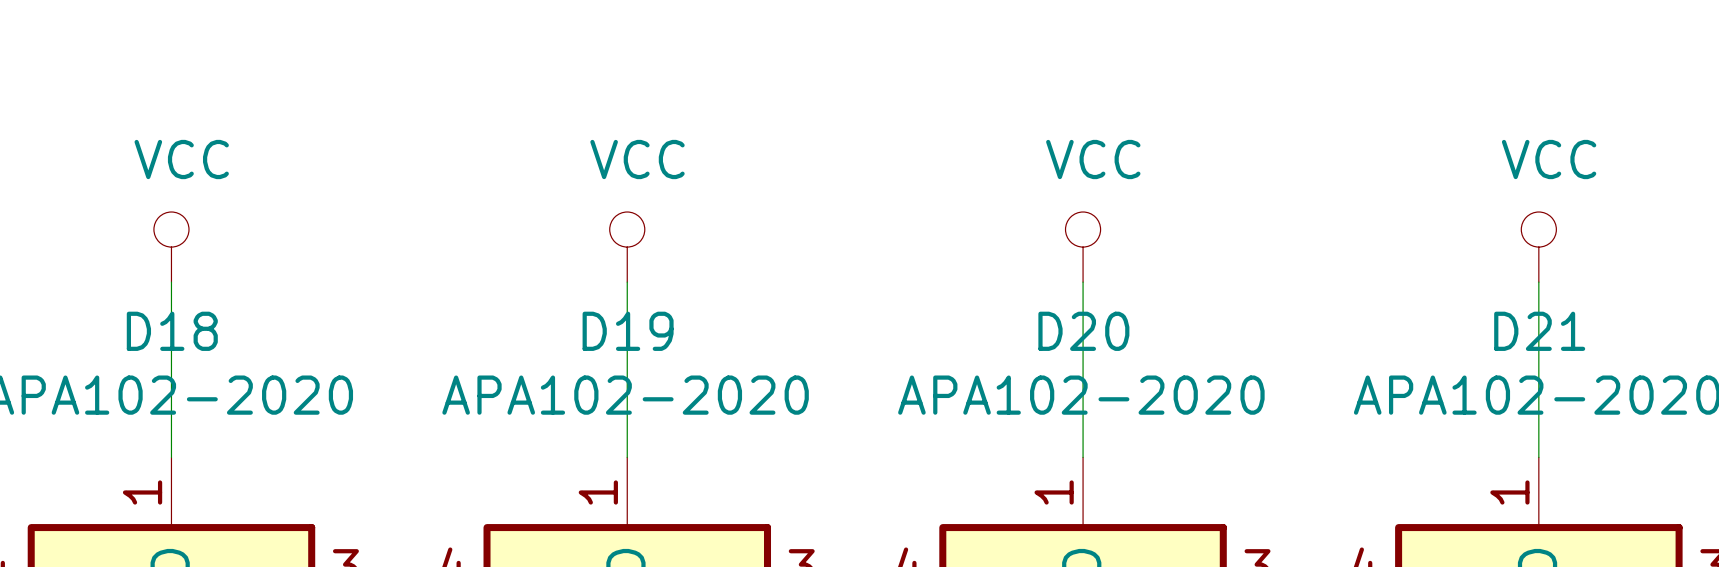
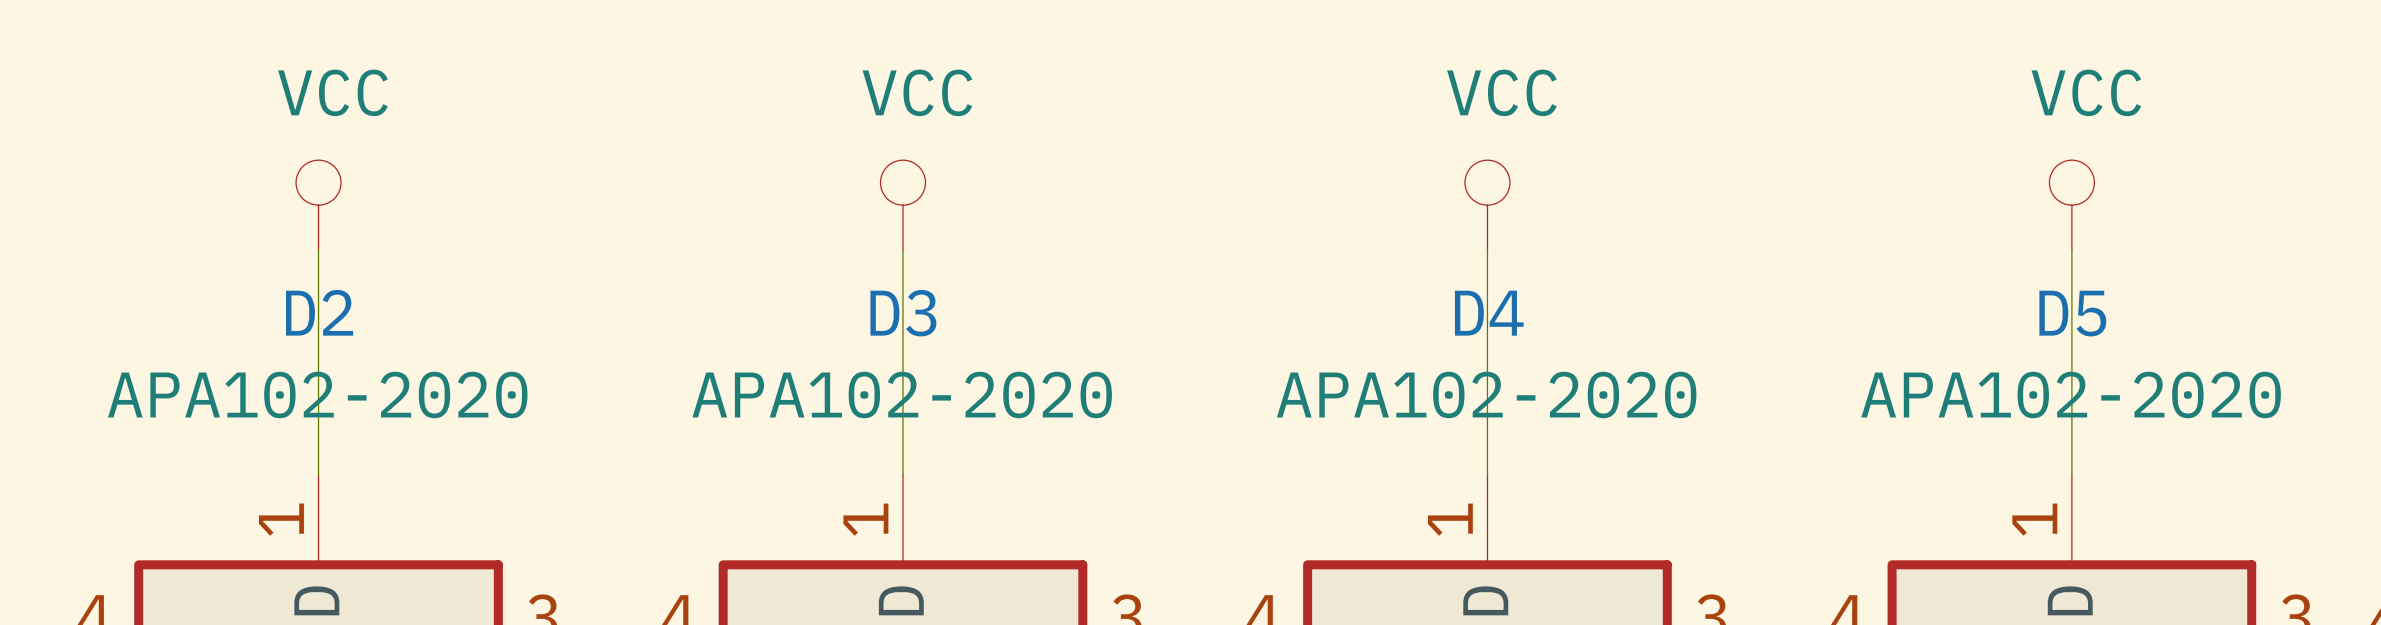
D18 name: D18 (172, 331) -> D2 (319, 312)
D19 name: D19 (628, 331) -> D3 (903, 313)
D20 name: D20 (1083, 331) -> D4 (1489, 313)
D21 name: D21 (1539, 331) -> D5 (2072, 313)

